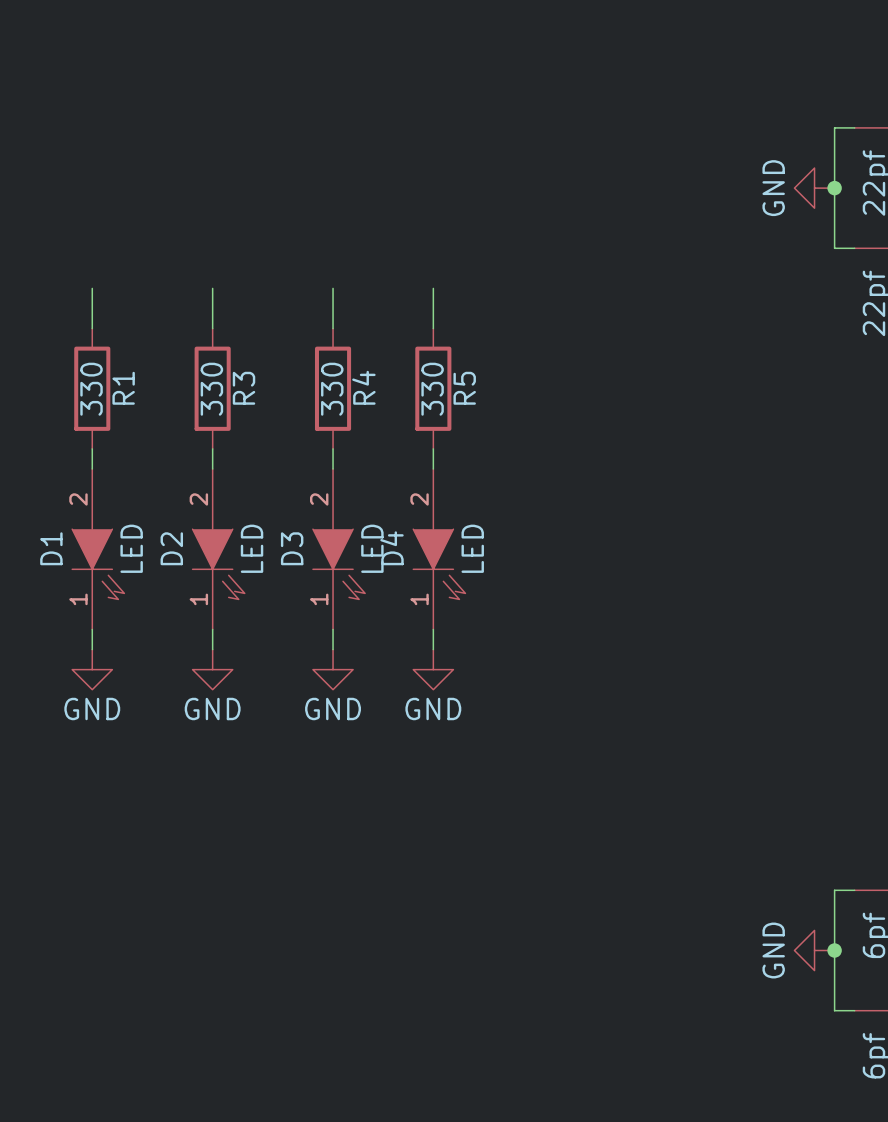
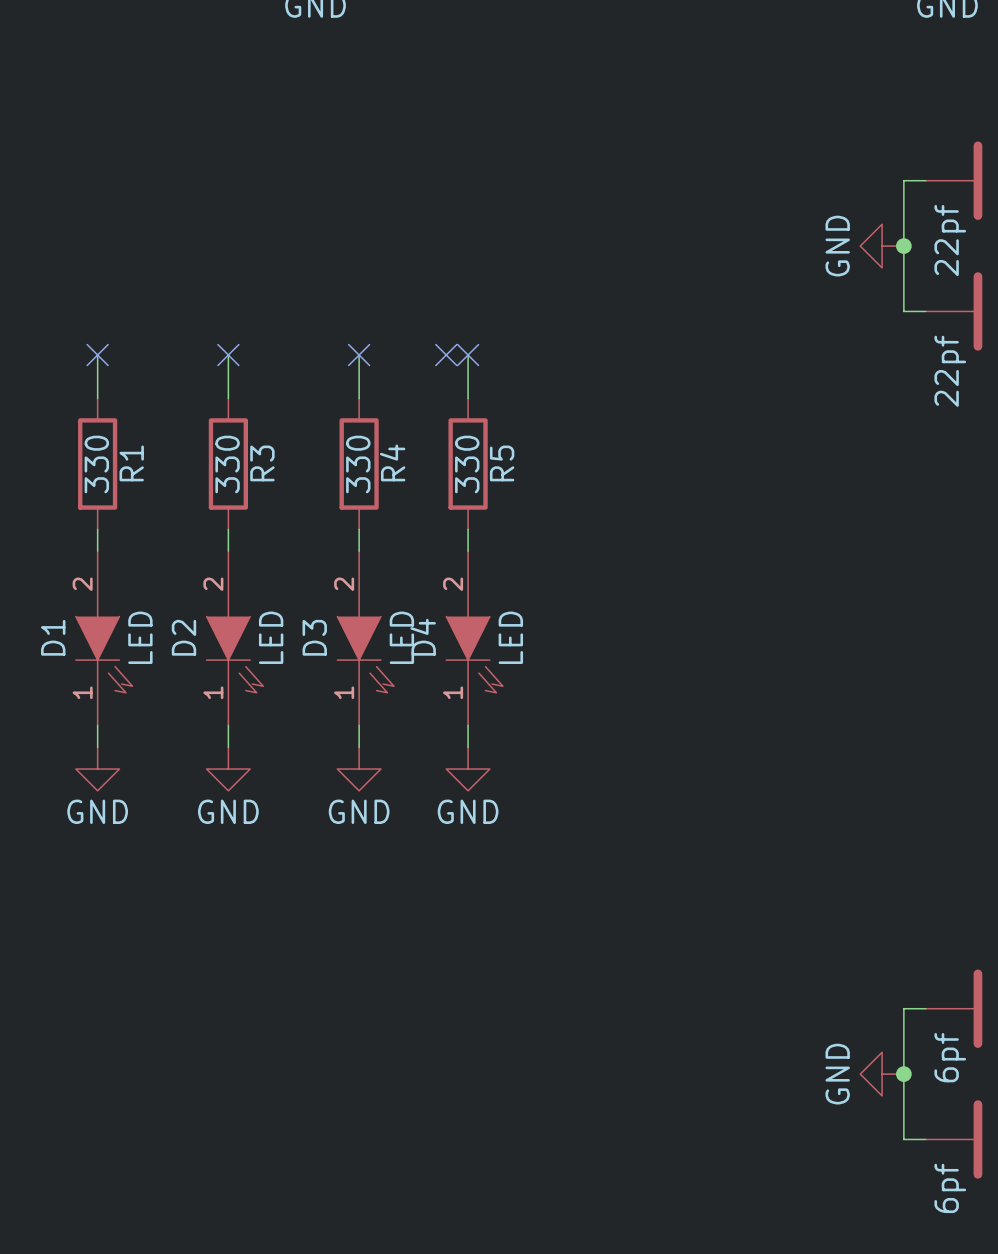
no-connect mark: none -> (97, 355)
no-connect mark: none -> (228, 355)
no-connect mark: none -> (359, 355)
no-connect mark: none -> (446, 355)
no-connect mark: none -> (468, 355)

